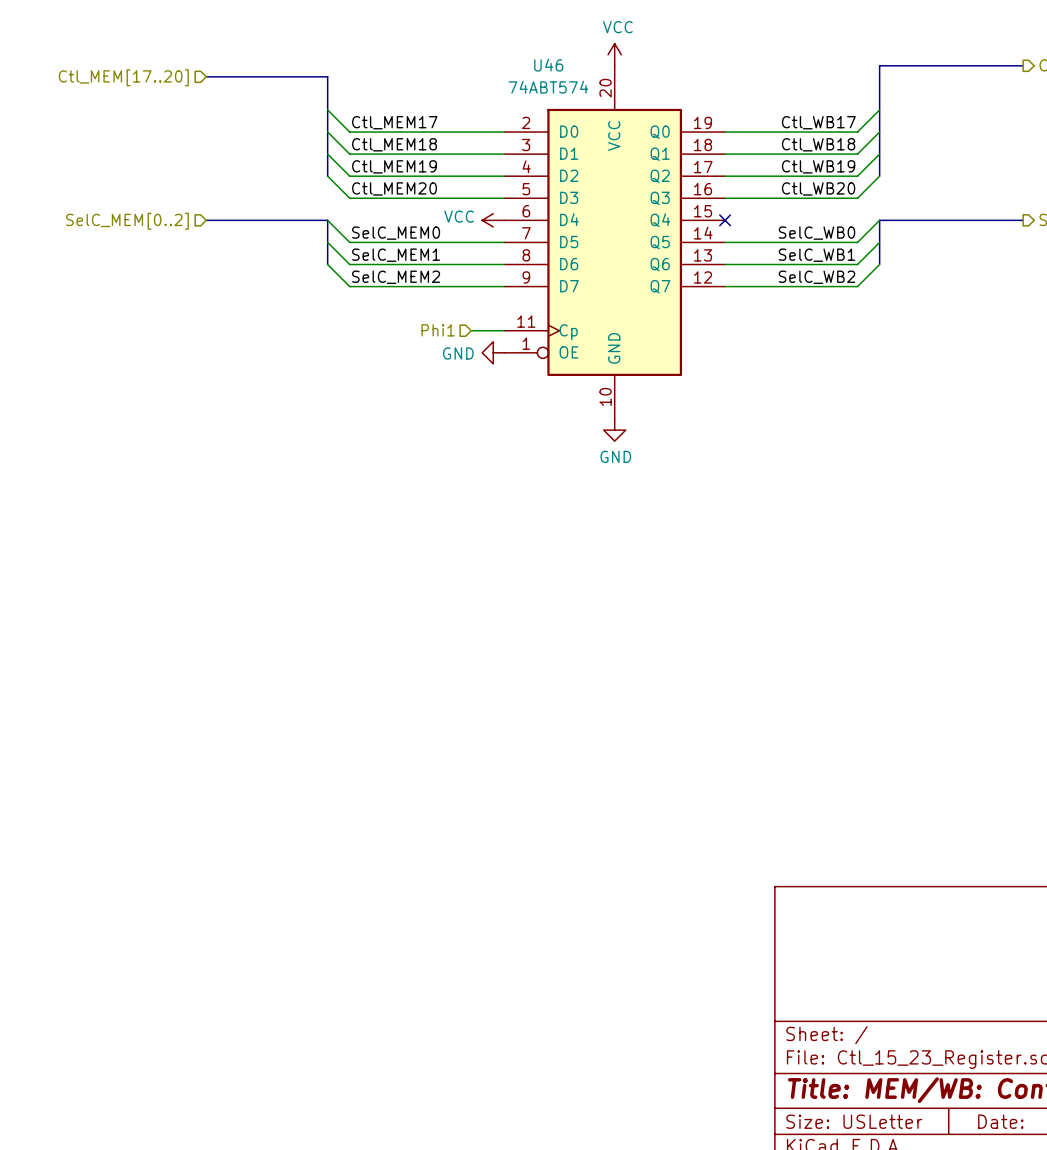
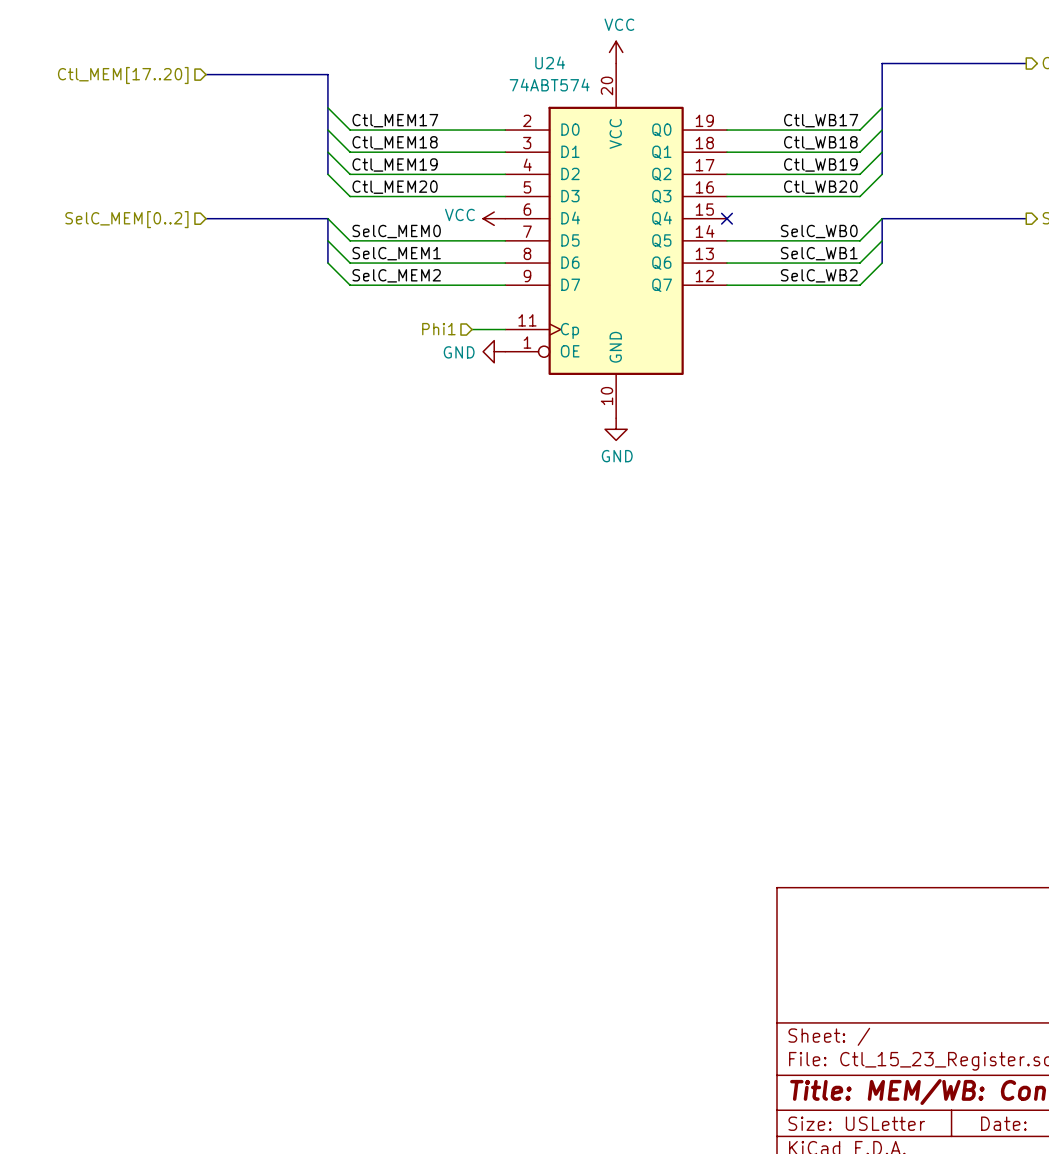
U46 name: U46 (548, 65) -> U24 (550, 62)

